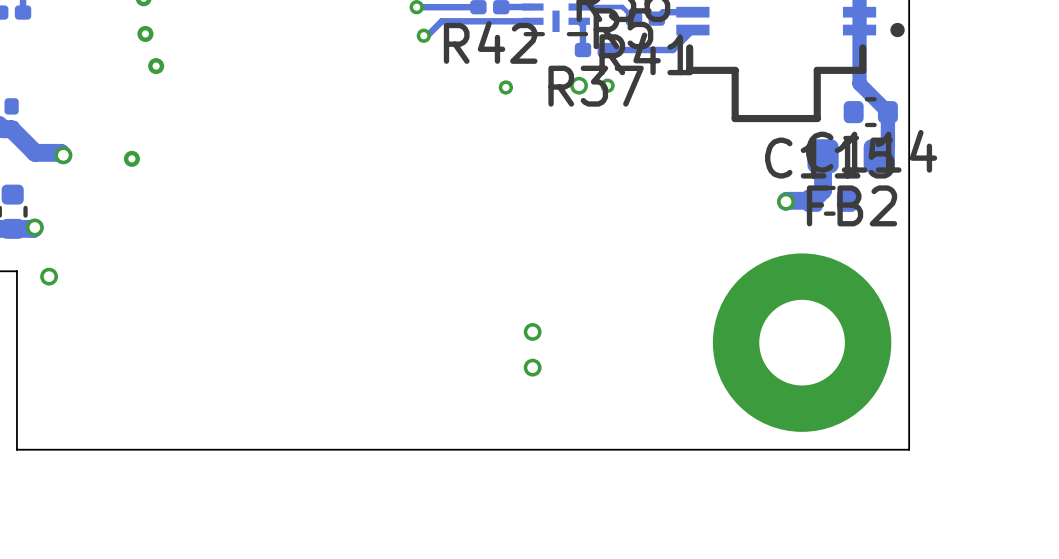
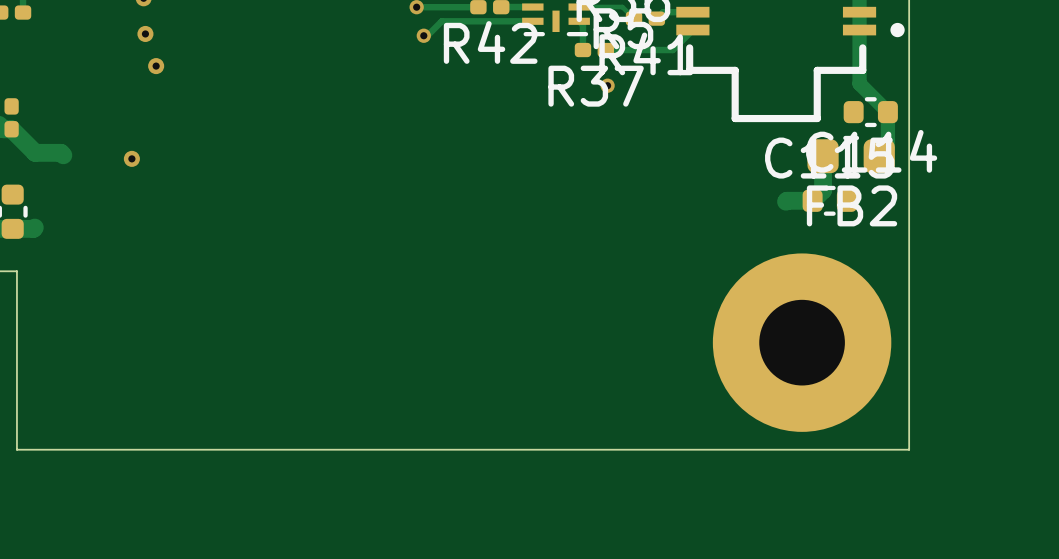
via: (579, 85) -> none
via: (505, 87) -> none
via: (63, 155) -> none
via: (786, 201) -> none
via: (34, 227) -> none
via: (49, 276) -> none
via: (532, 331) -> none
via: (532, 367) -> none

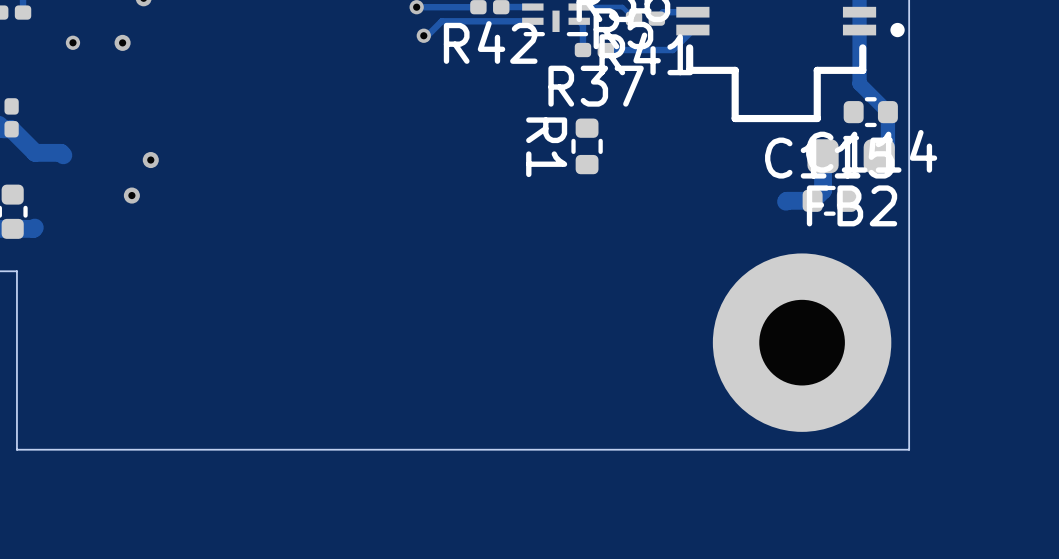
via: (145, 33) -> none
via: none -> (72, 42)
via: none -> (122, 42)
via: (156, 66) -> none
via: (607, 85) -> none
R1: none -> (587, 146)
via: (131, 158) -> none
via: none -> (150, 160)
via: none -> (131, 195)

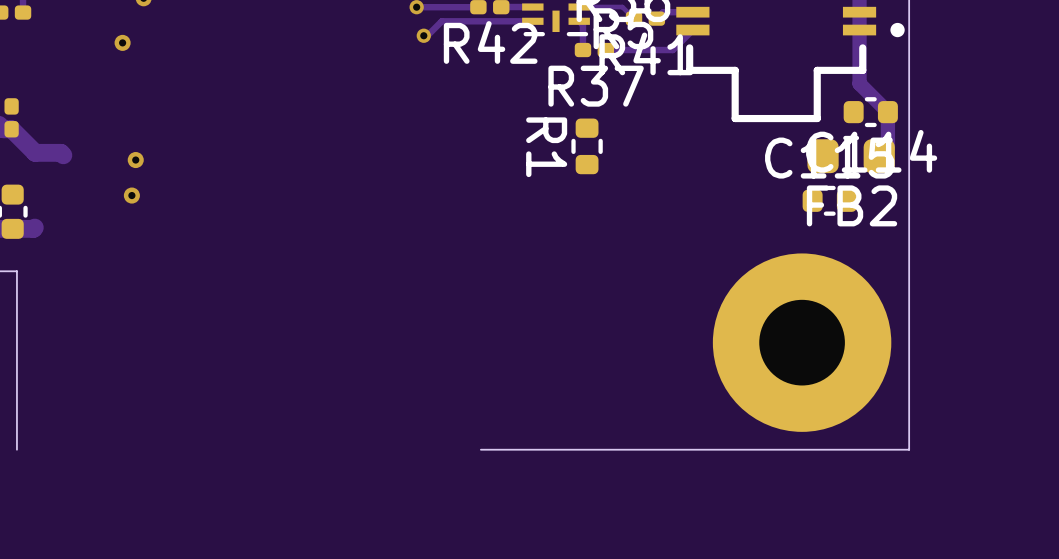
via: (72, 42) -> none
track: (823, 156) (823, 190) (812, 200) (786, 201) -> none
via position: (150, 160) -> (135, 160)
board edge: (480, 449) (16, 449) -> none

